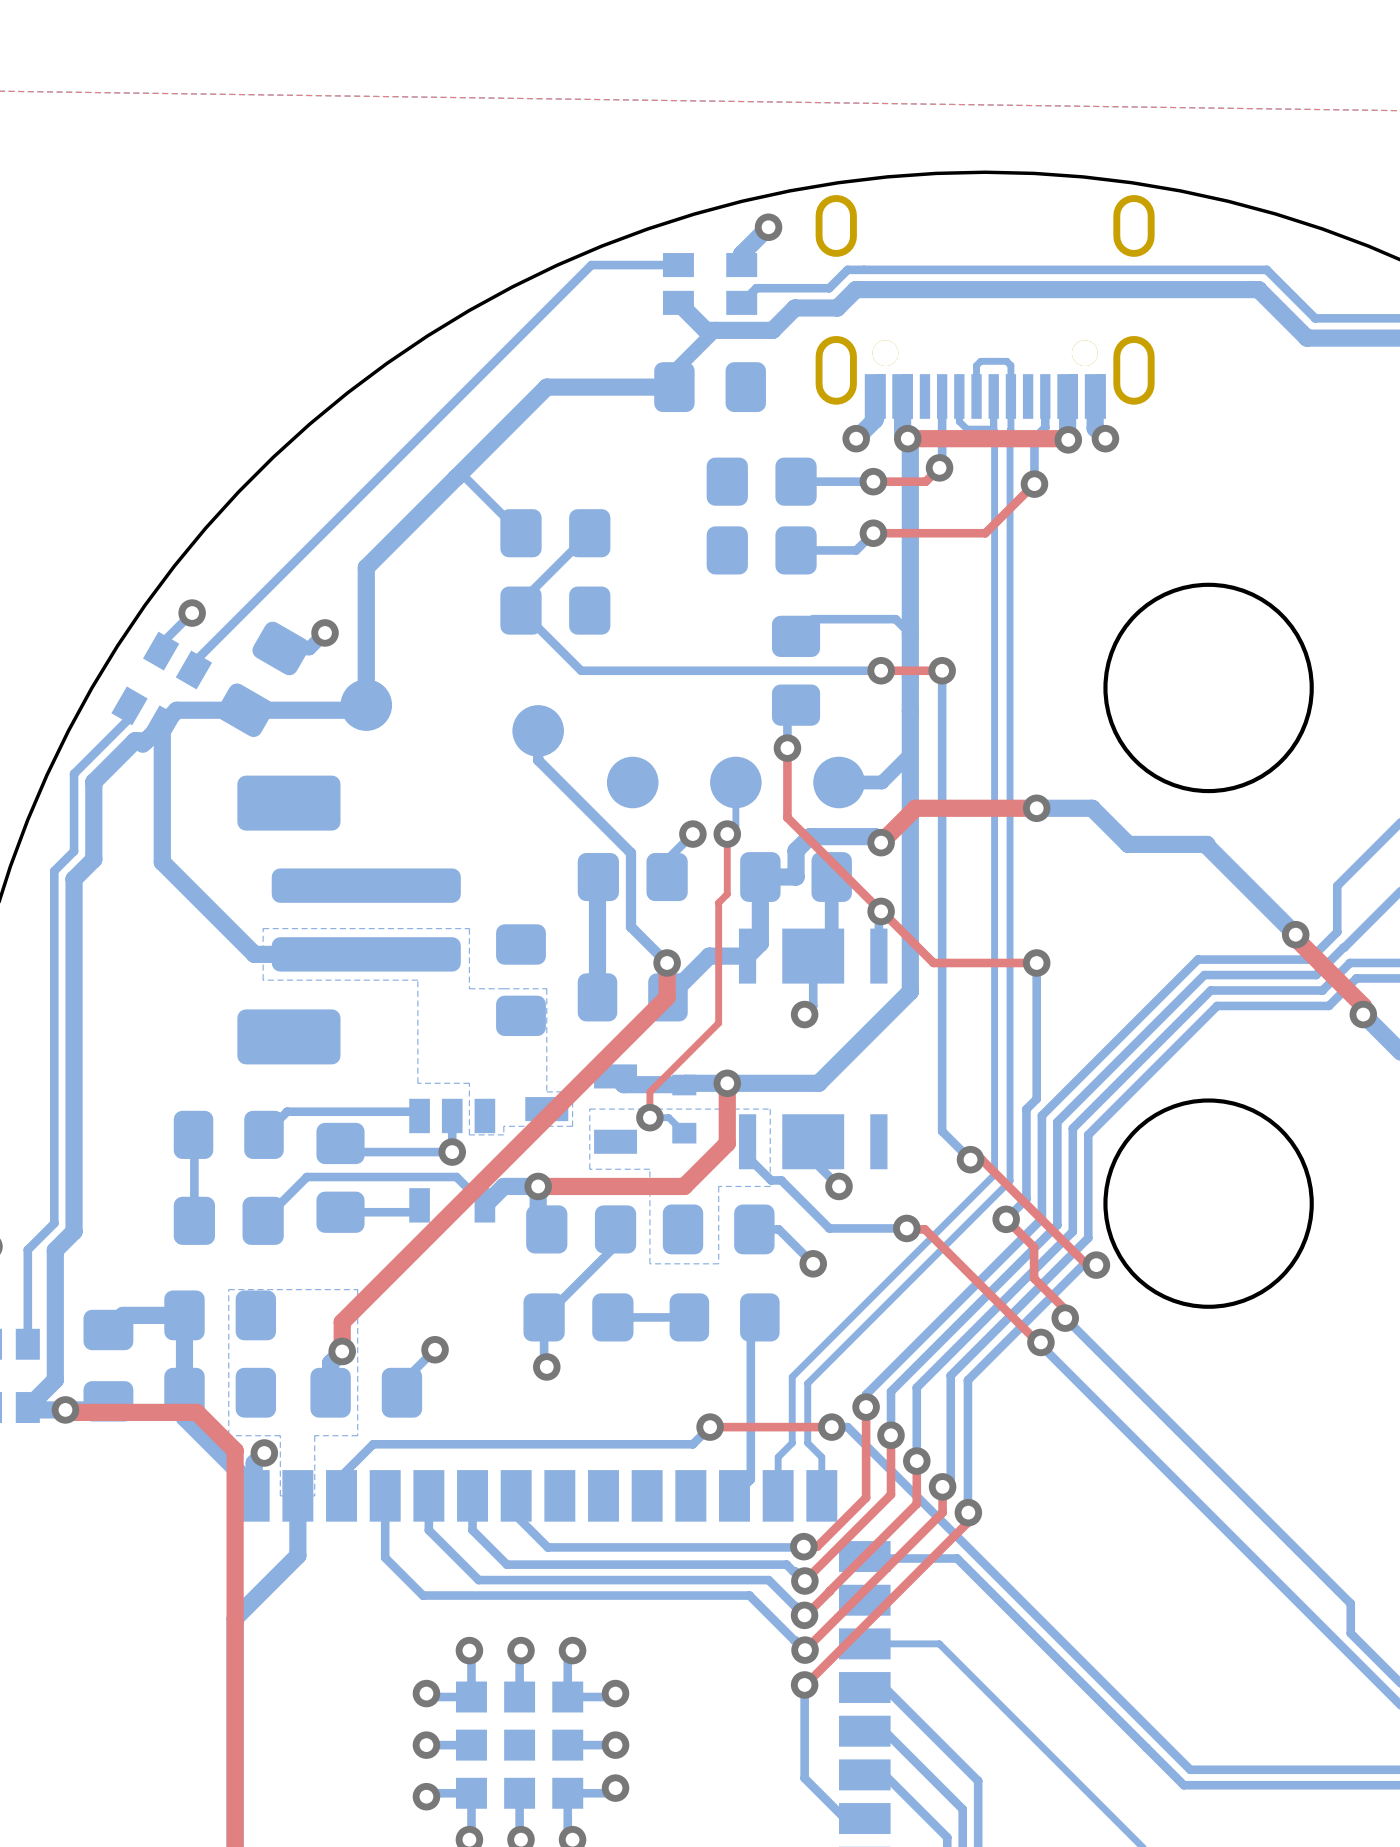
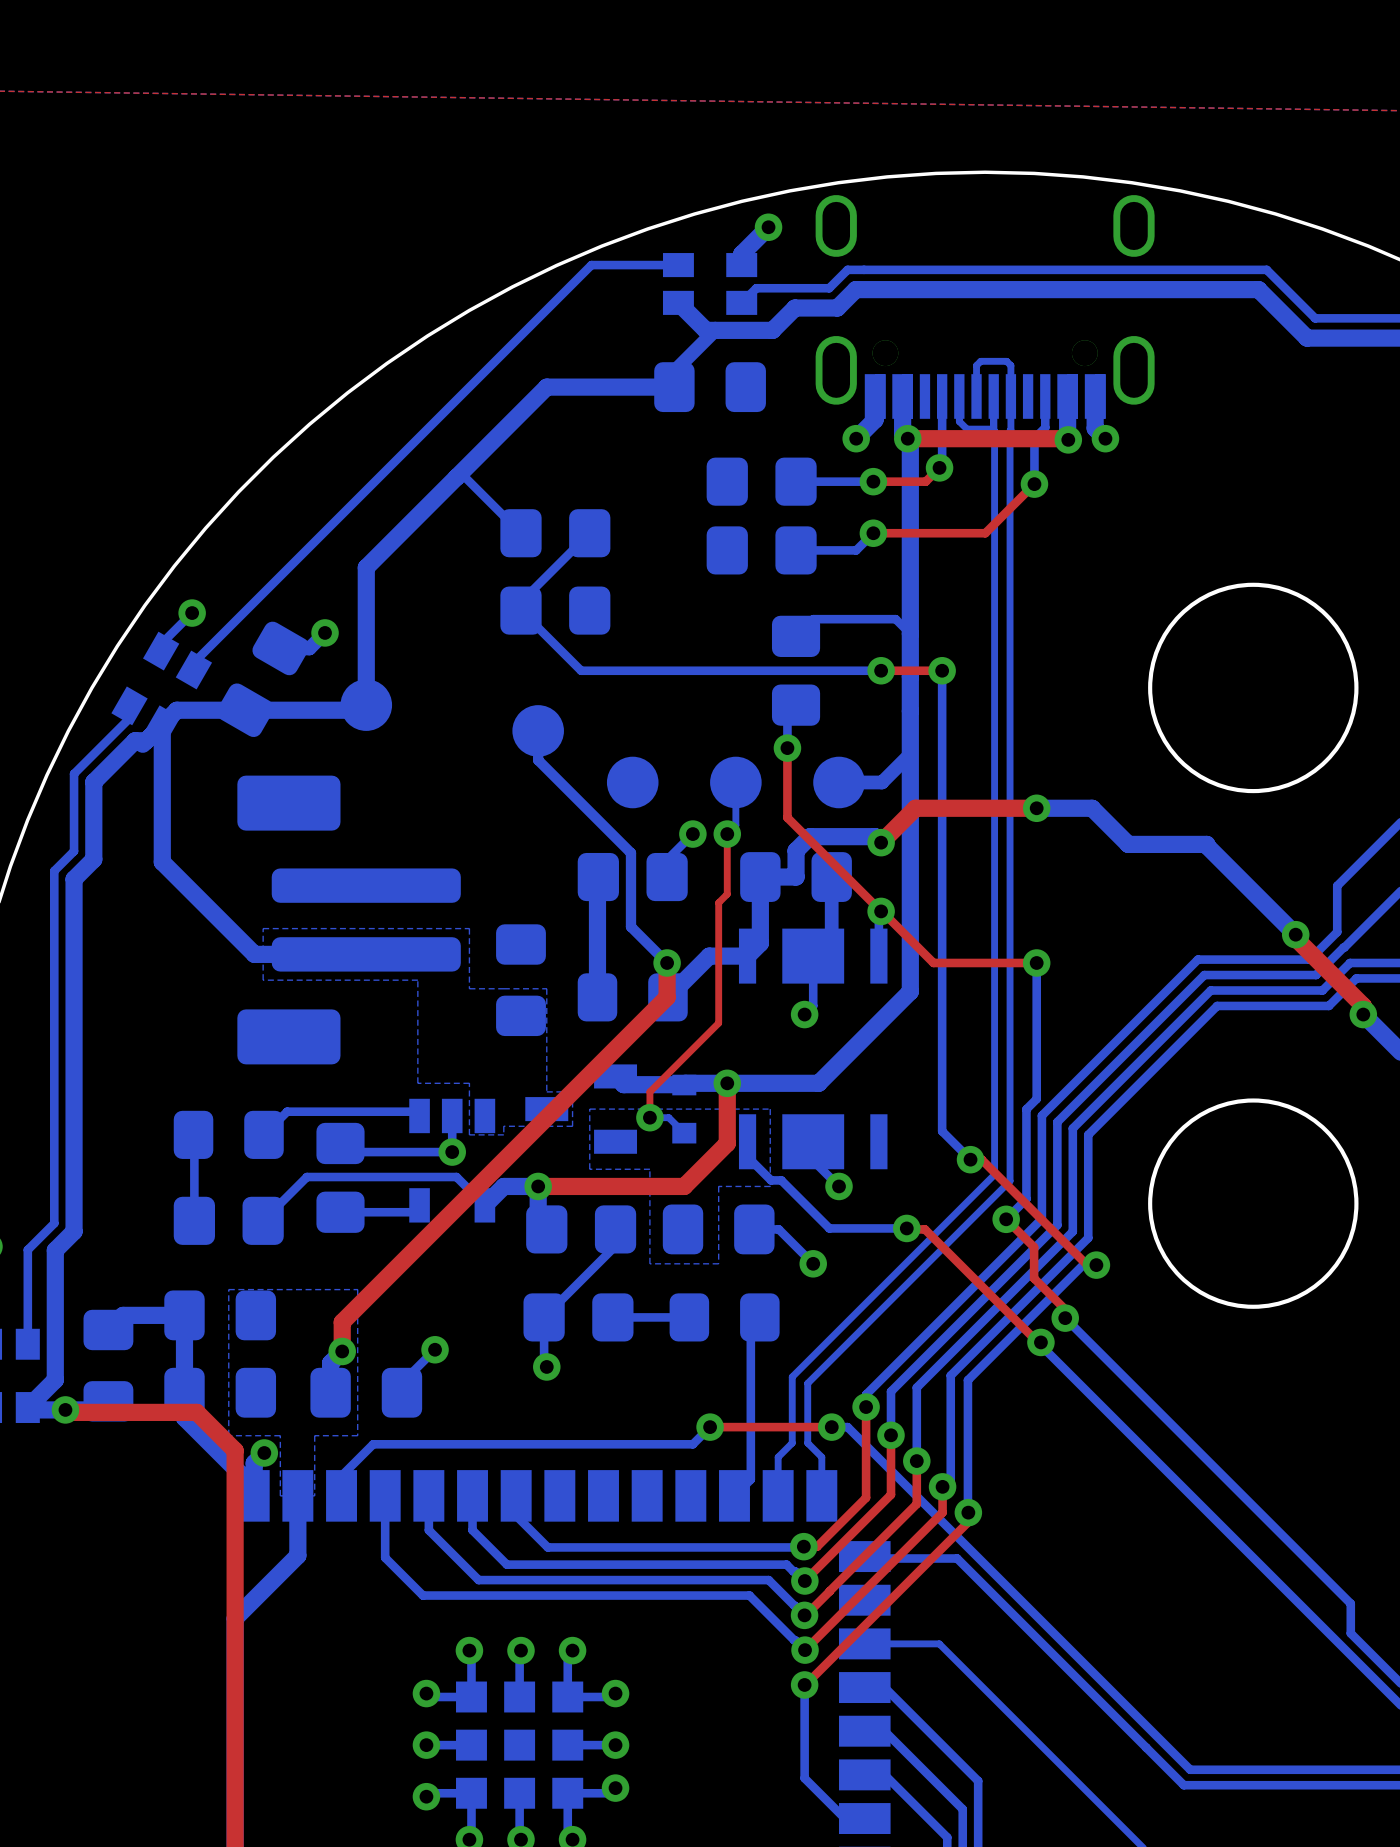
drawing position: (1208, 945) -> (1253, 945)

